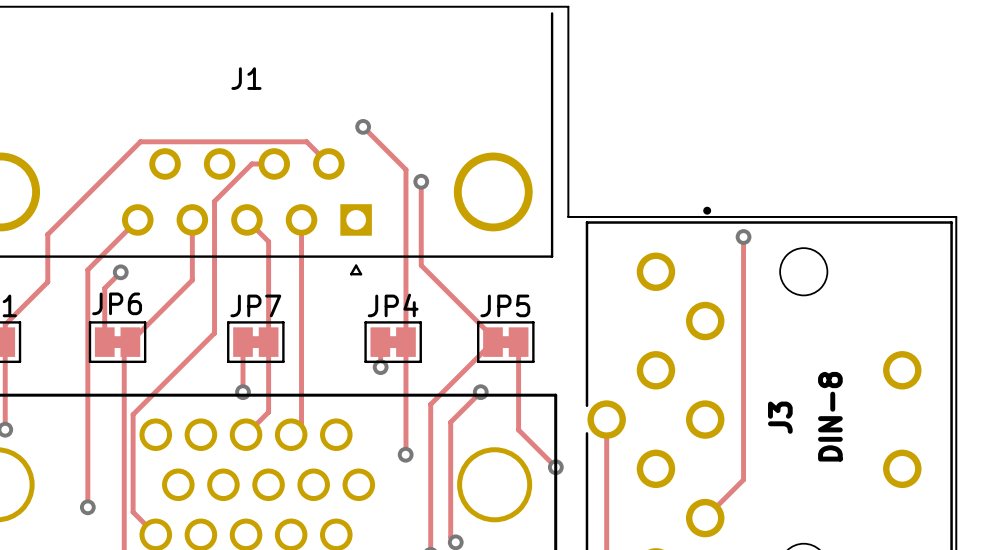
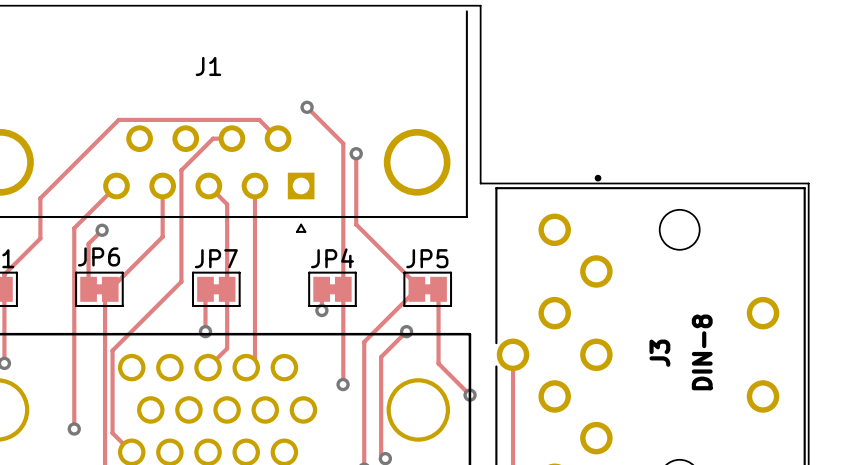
track: (743, 237) (743, 479) (705, 518) -> none
via: (743, 237) -> none

